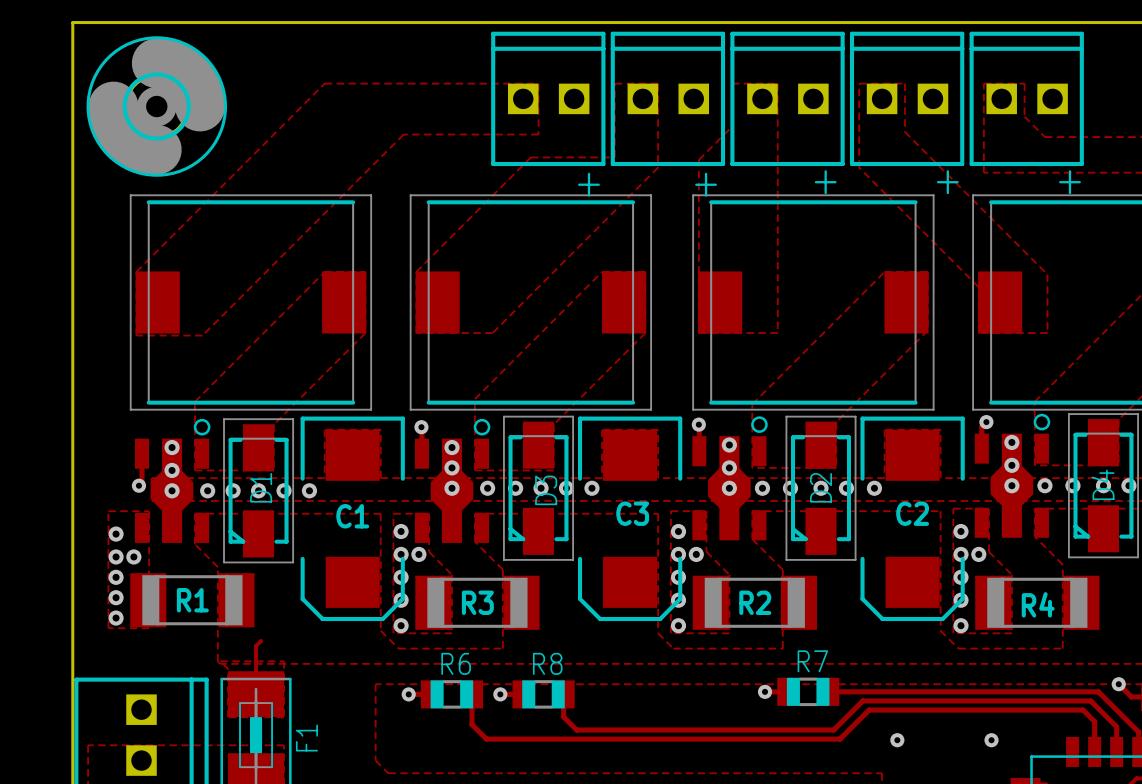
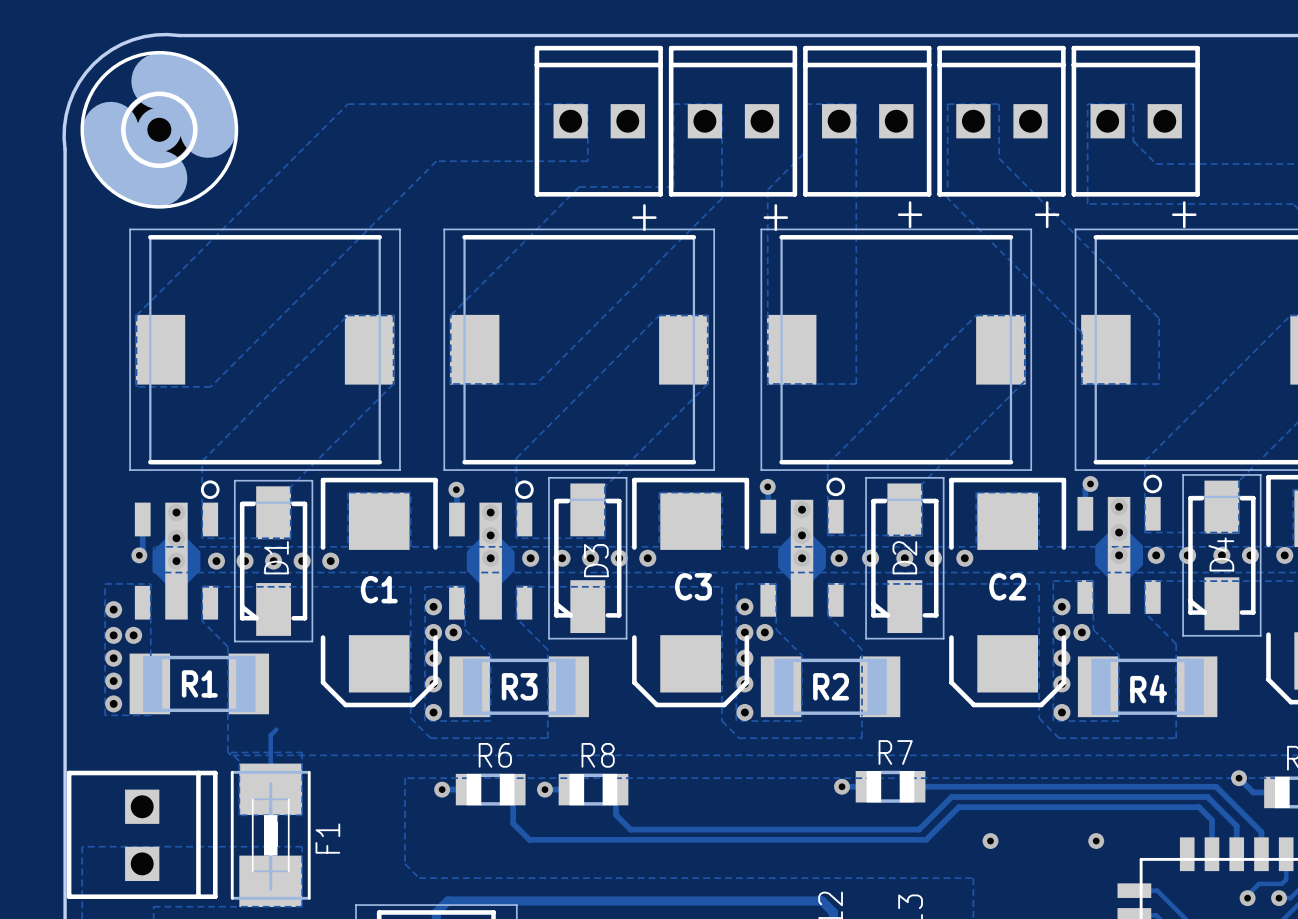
board edge: (174, 22) (72, 22) (72, 124) -> (179, 35) (155, 34) (133, 39) (111, 49) (93, 64) (79, 82) (69, 103) (64, 126) (65, 149)

